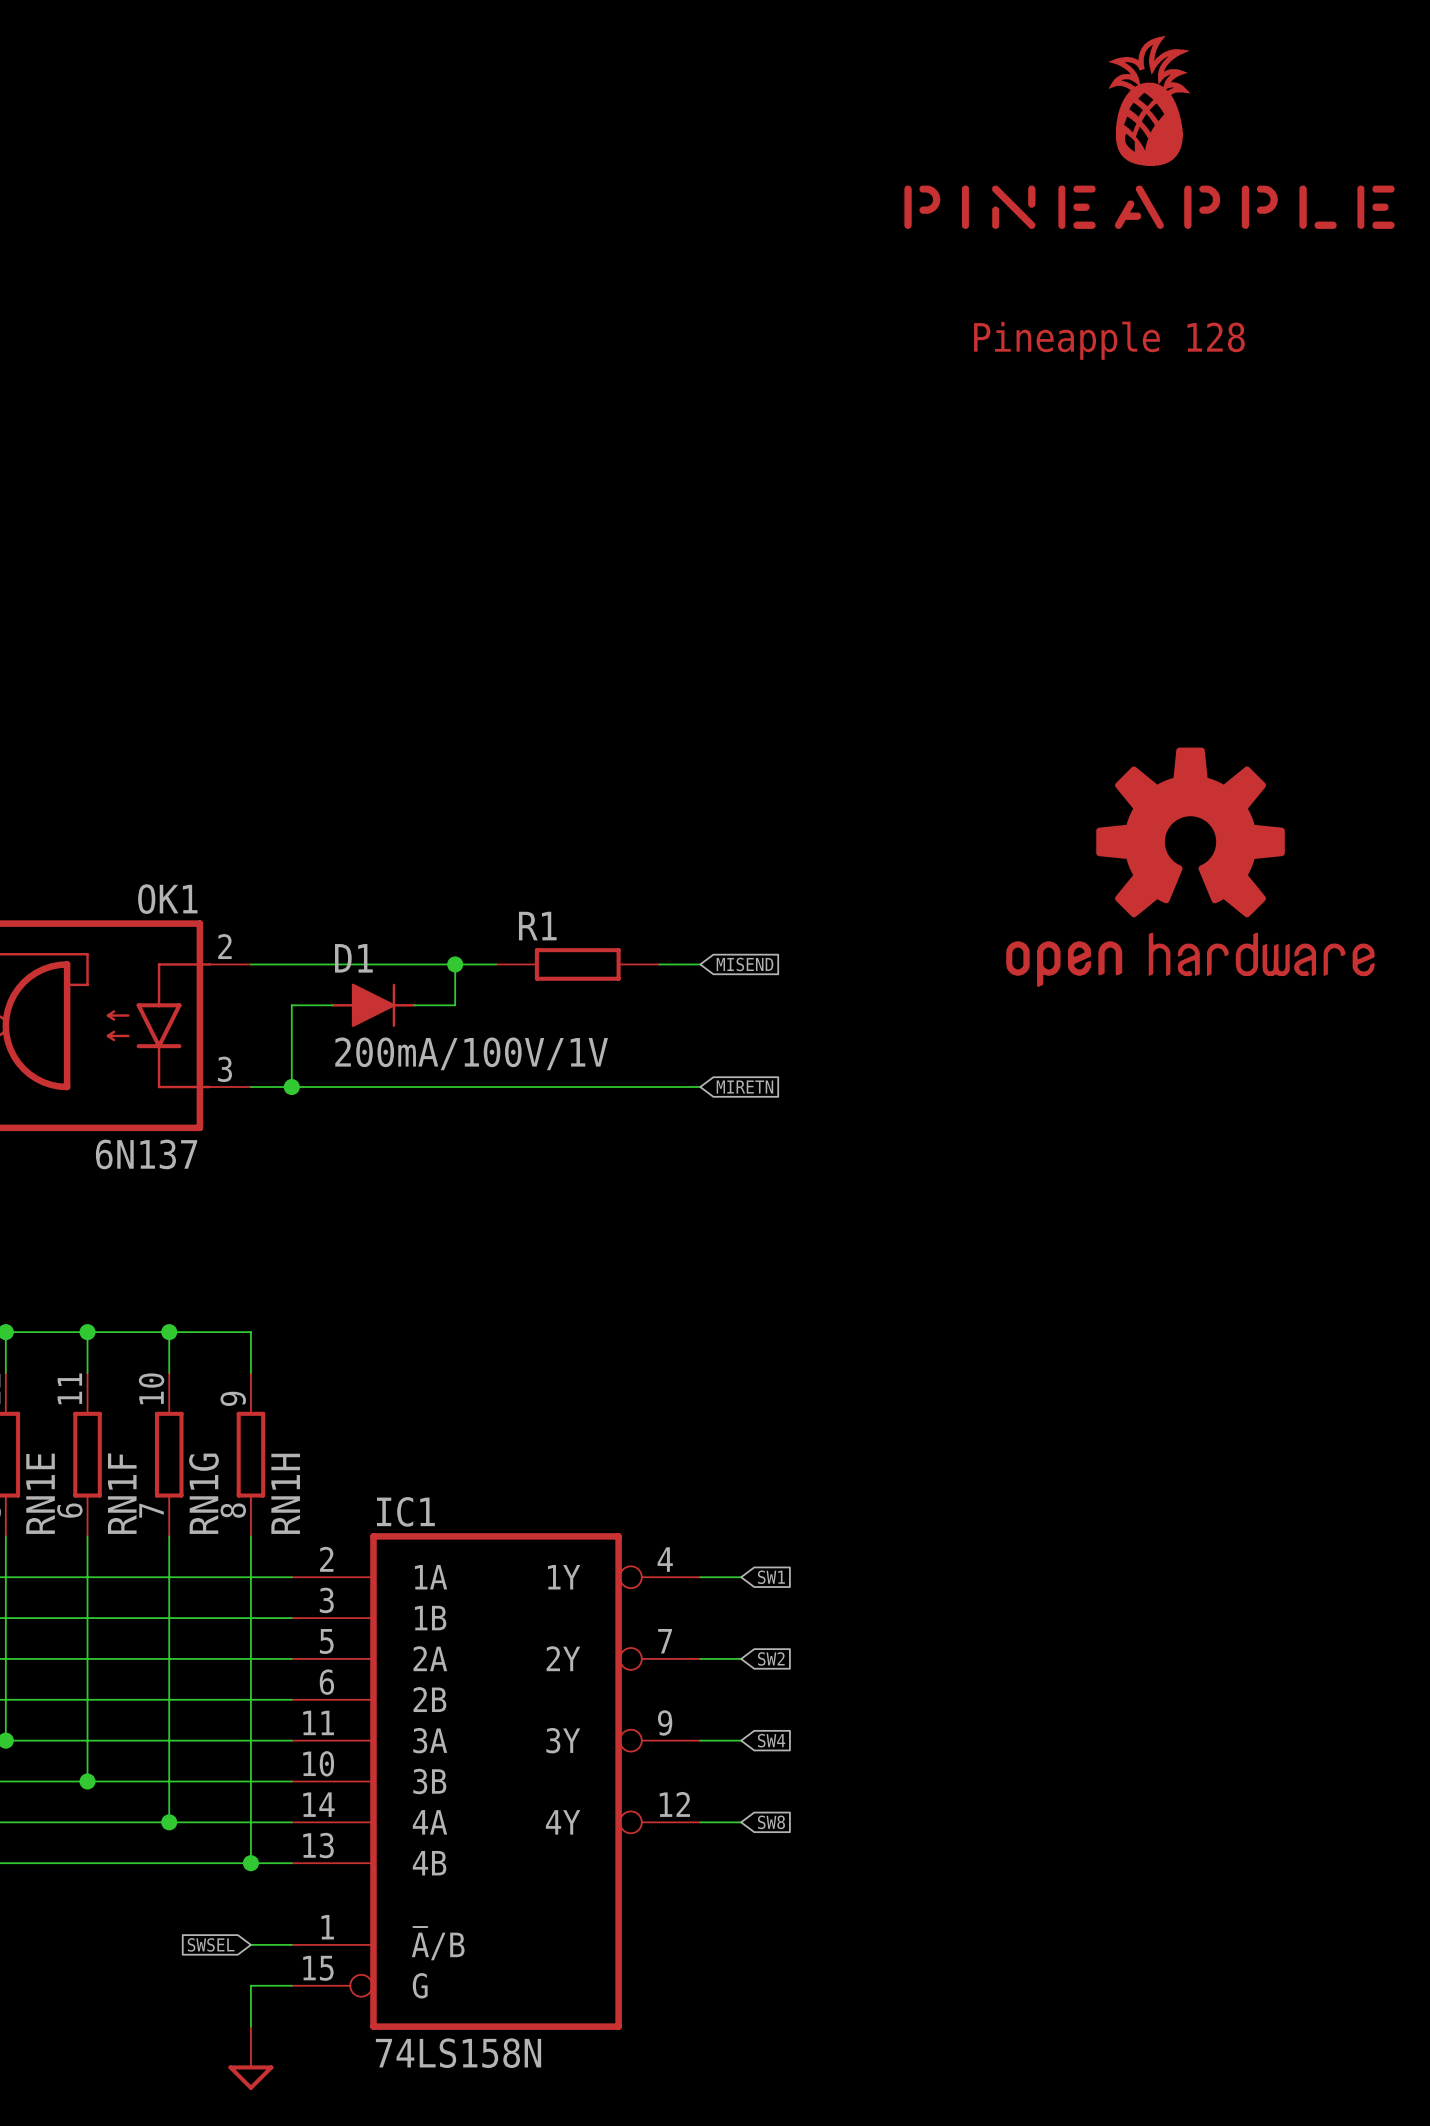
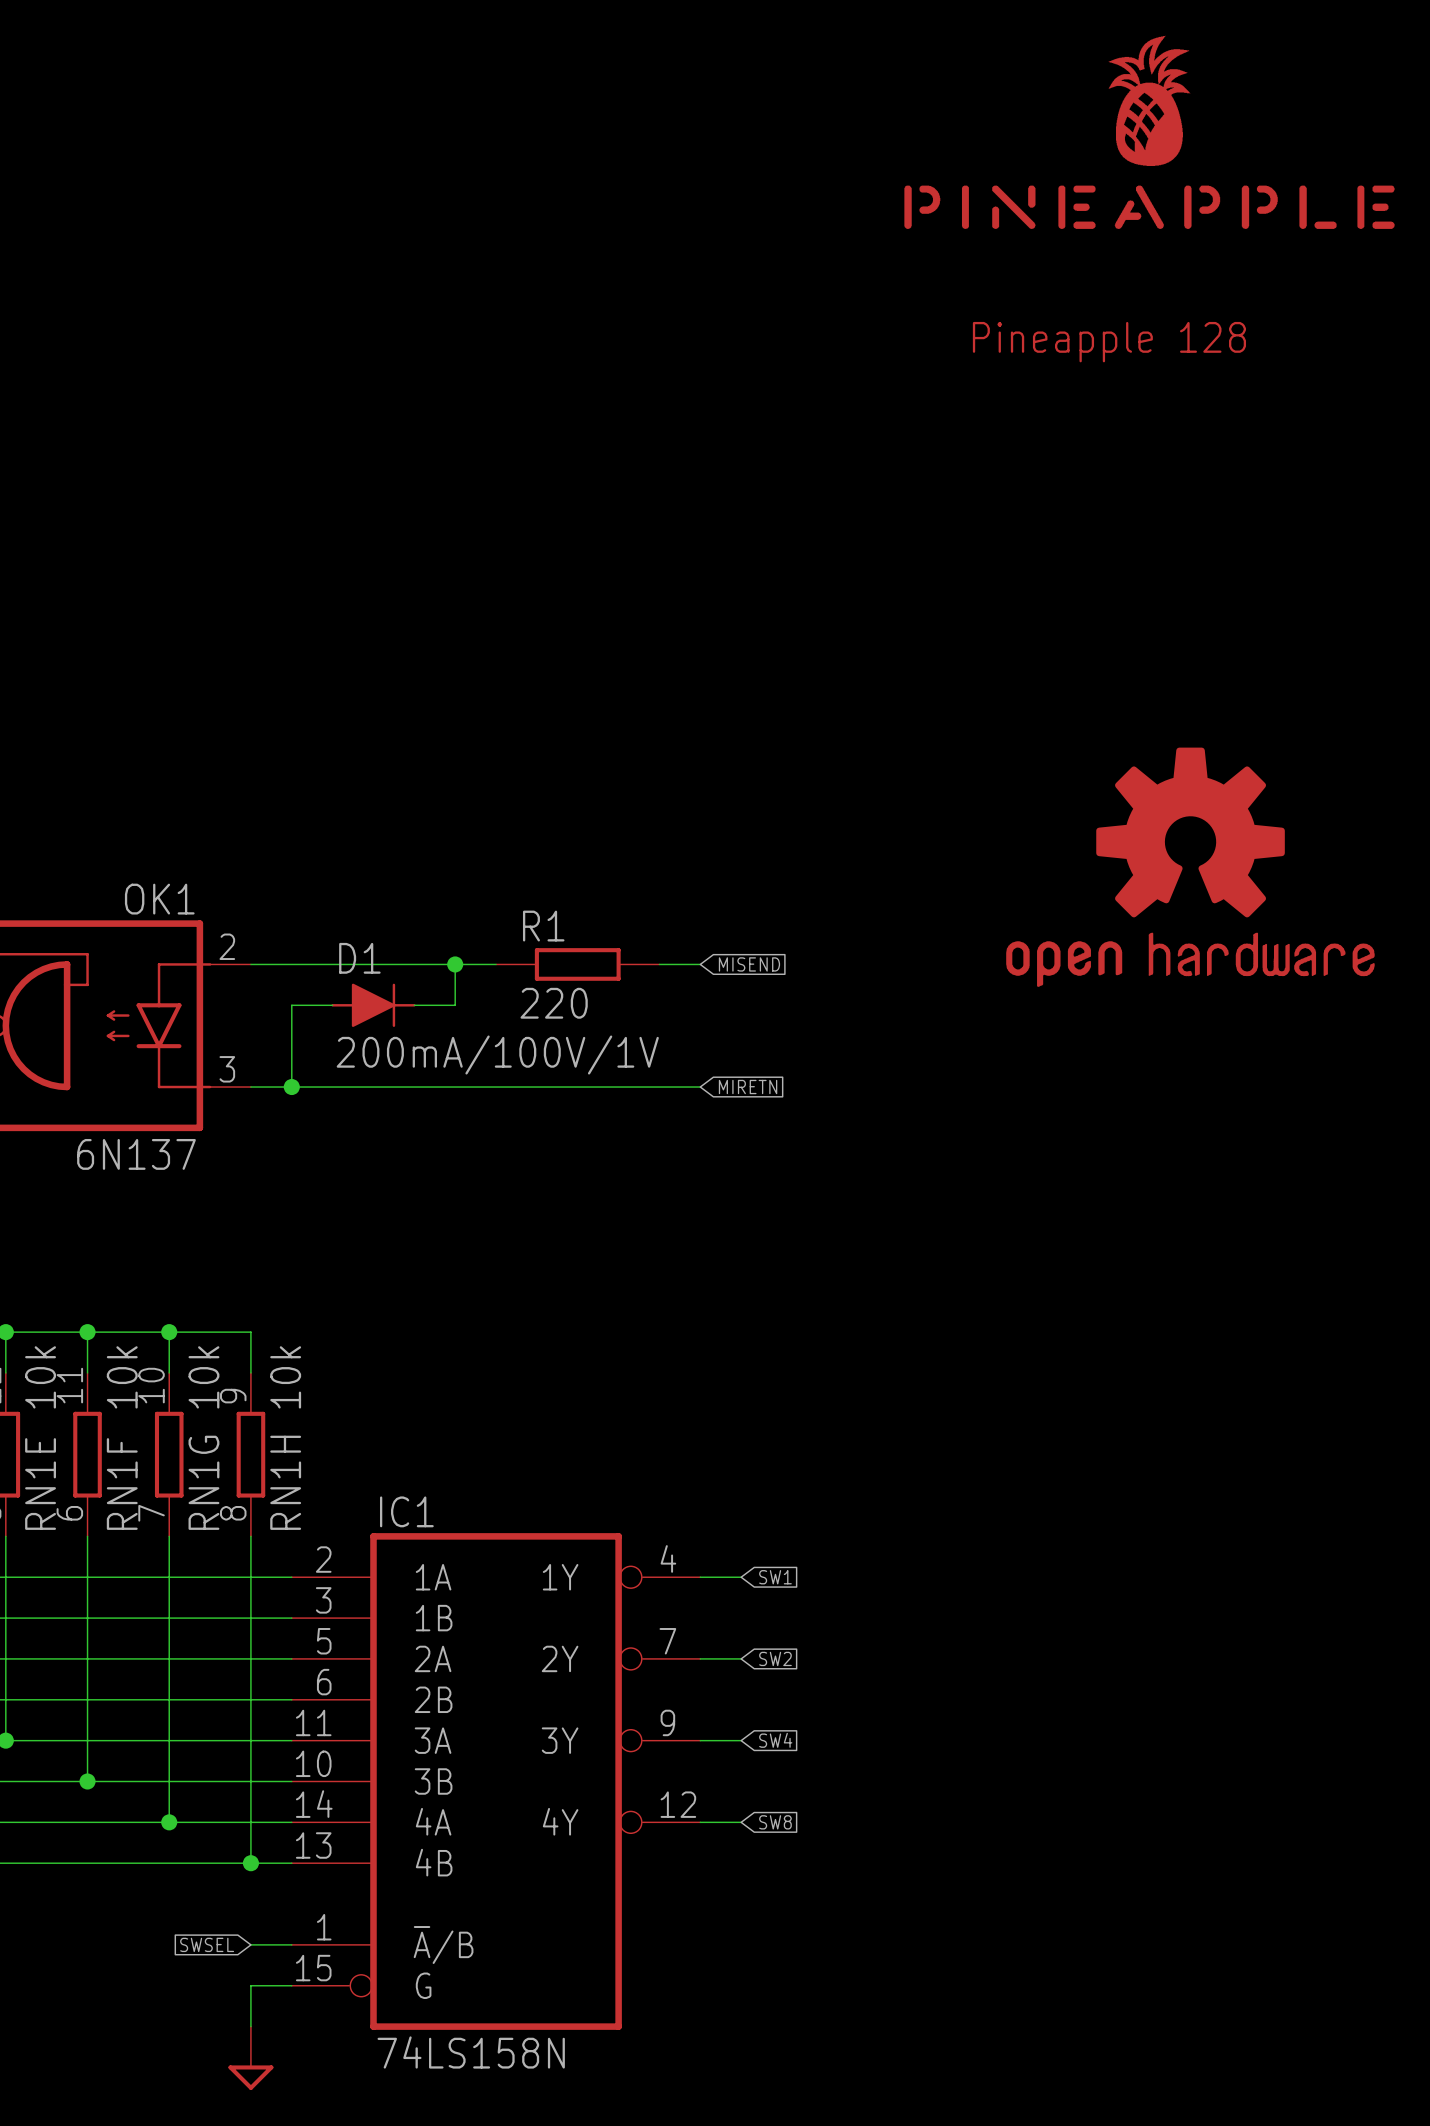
R1 value: none -> 220 (554, 1003)
RN1E value: none -> 10k (40, 1377)
RN1F value: none -> 10k (122, 1377)
RN1G value: none -> 10k (203, 1377)
RN1H value: none -> 10k (285, 1377)

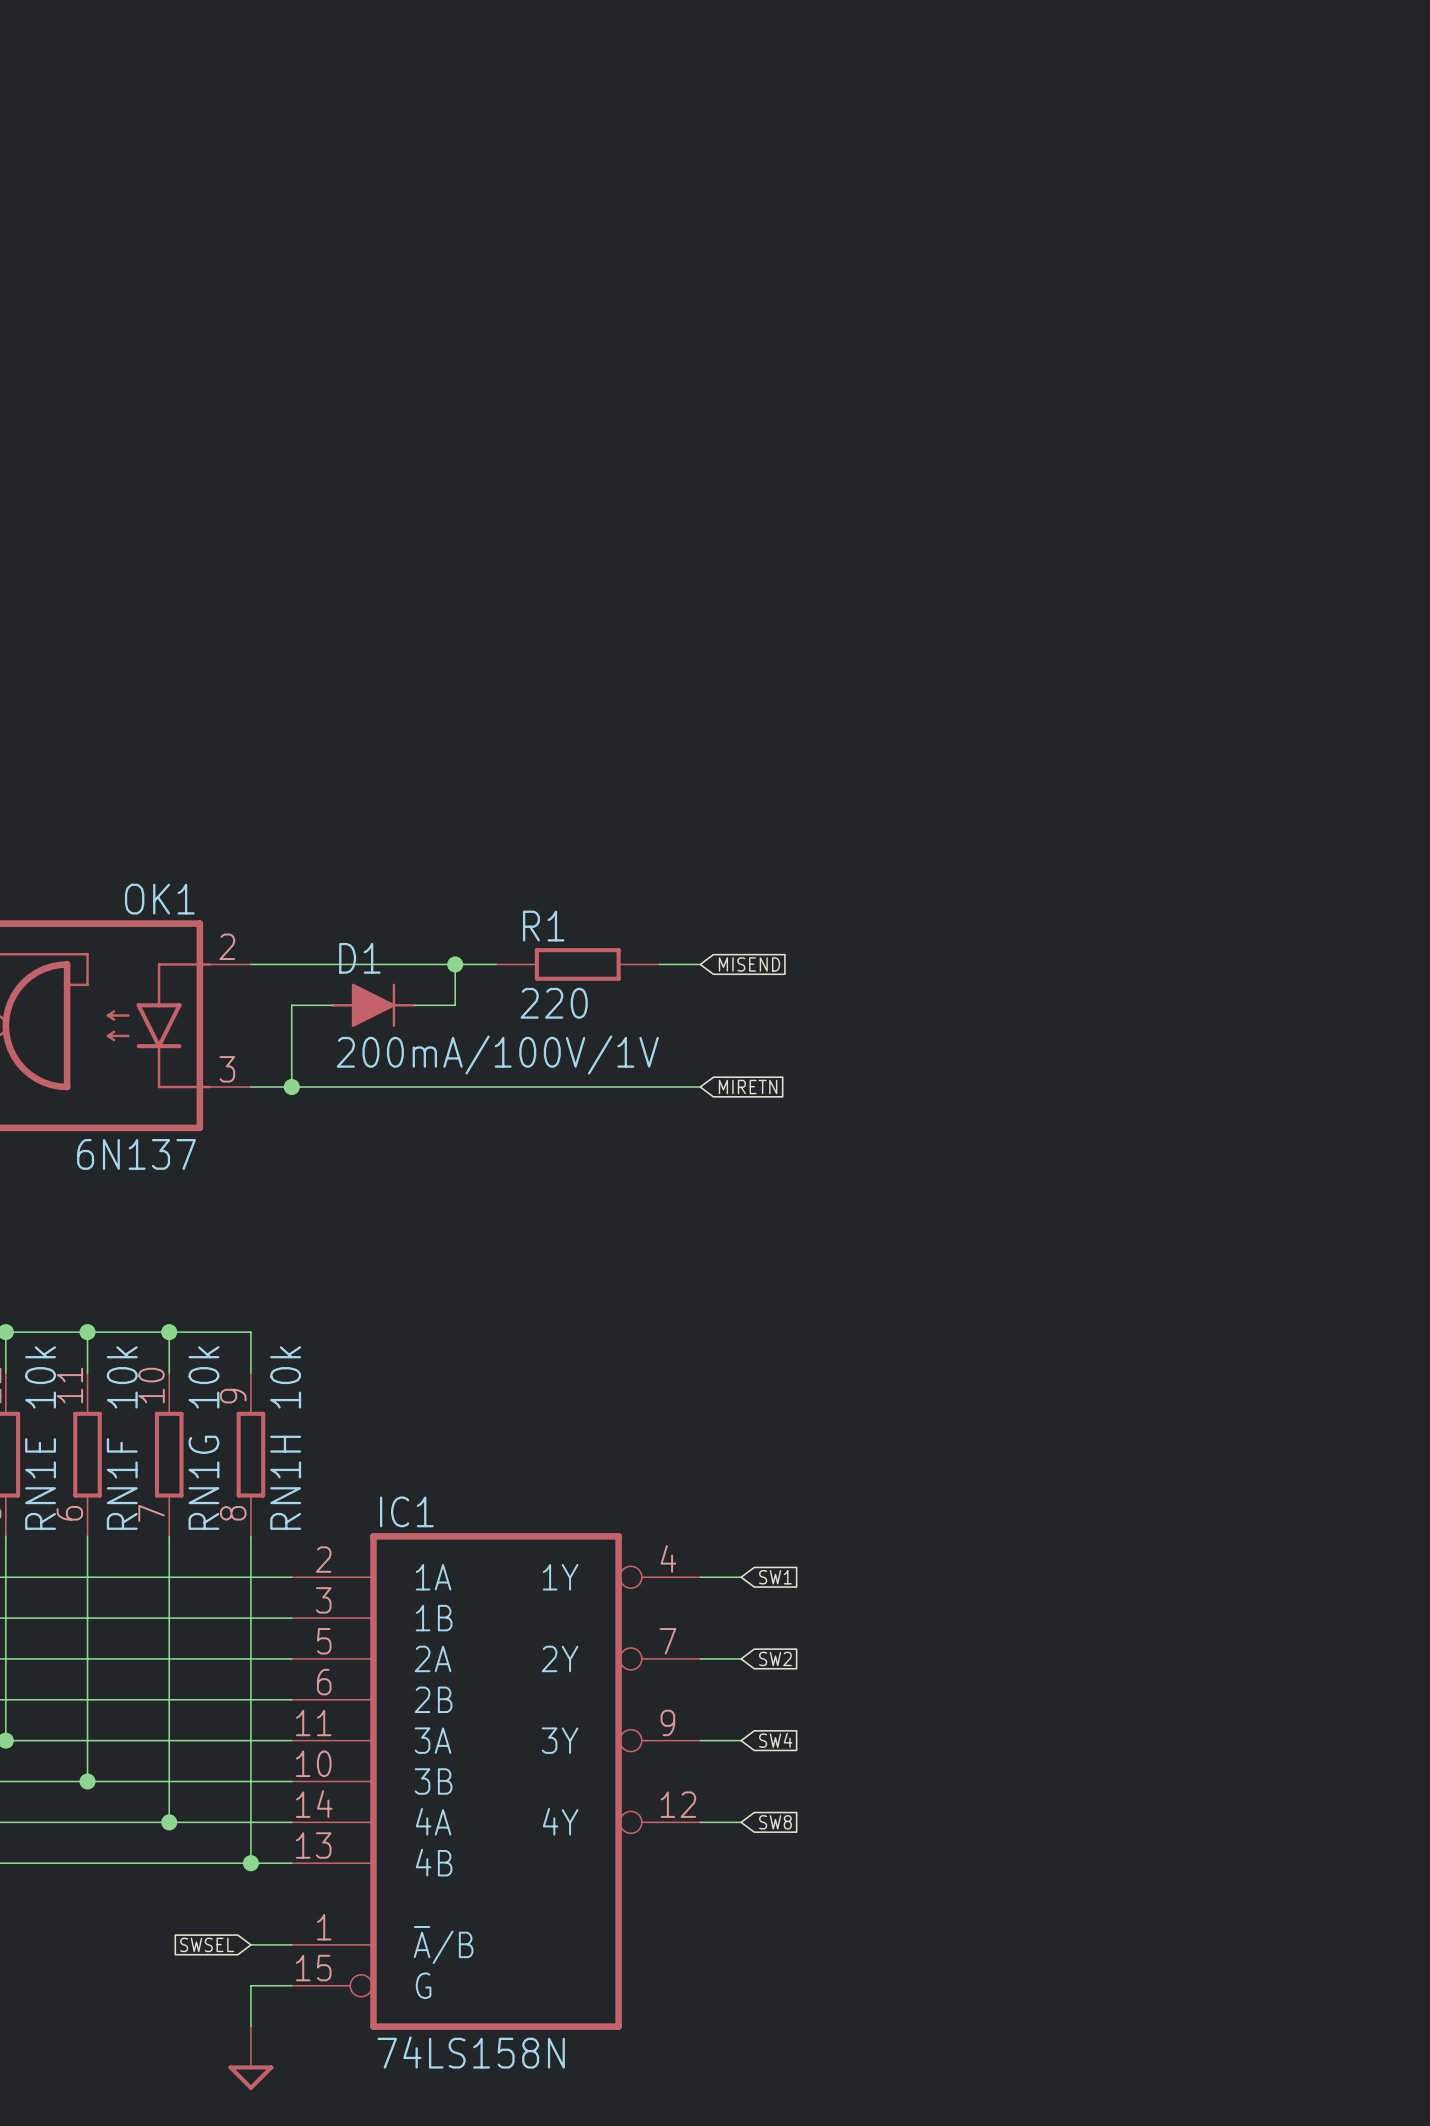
part: (1149, 132) -> none
text: Pineapple 128 (1109, 342) -> none
part: (1190, 867) -> none

